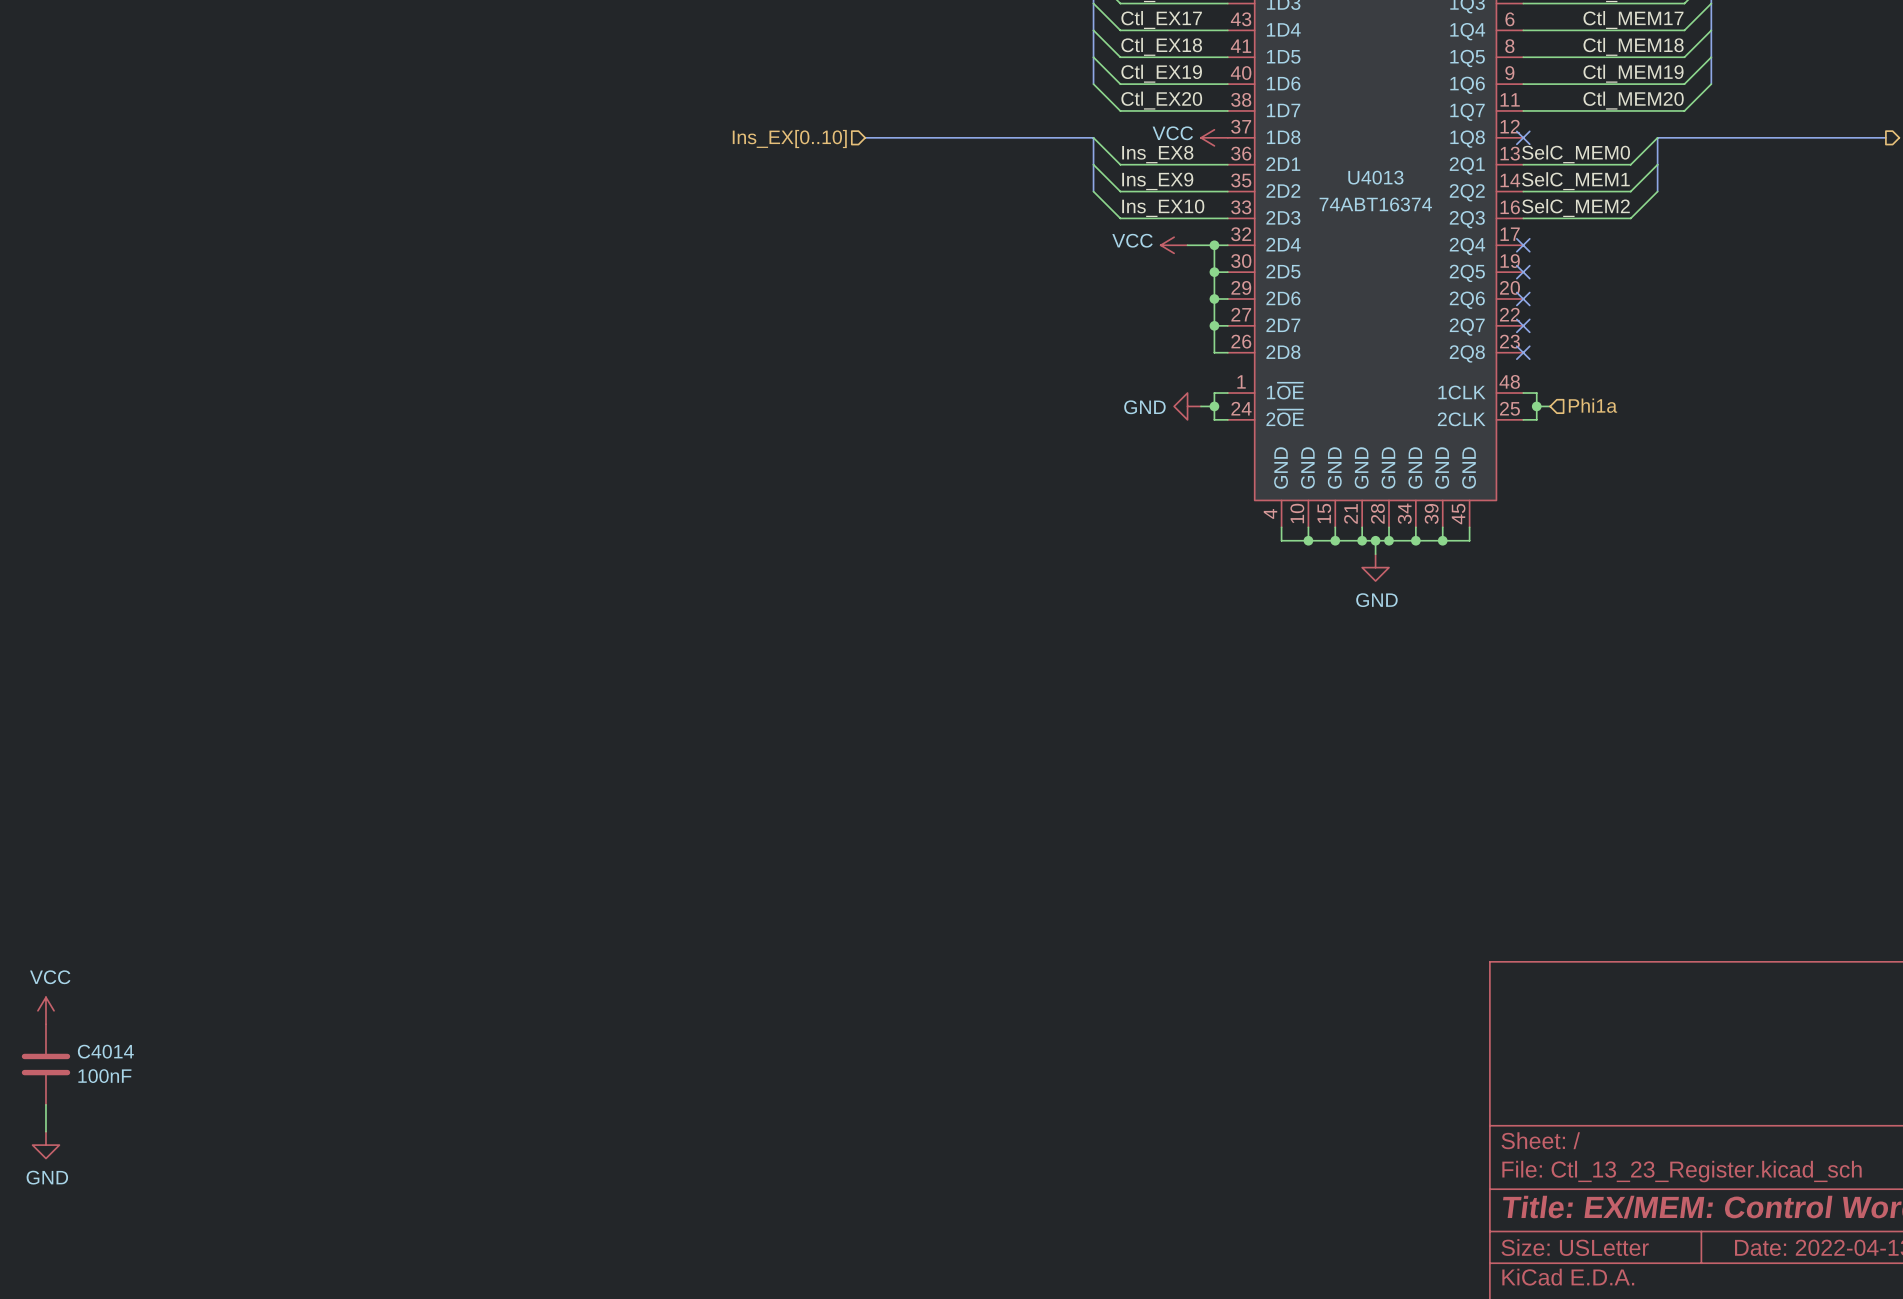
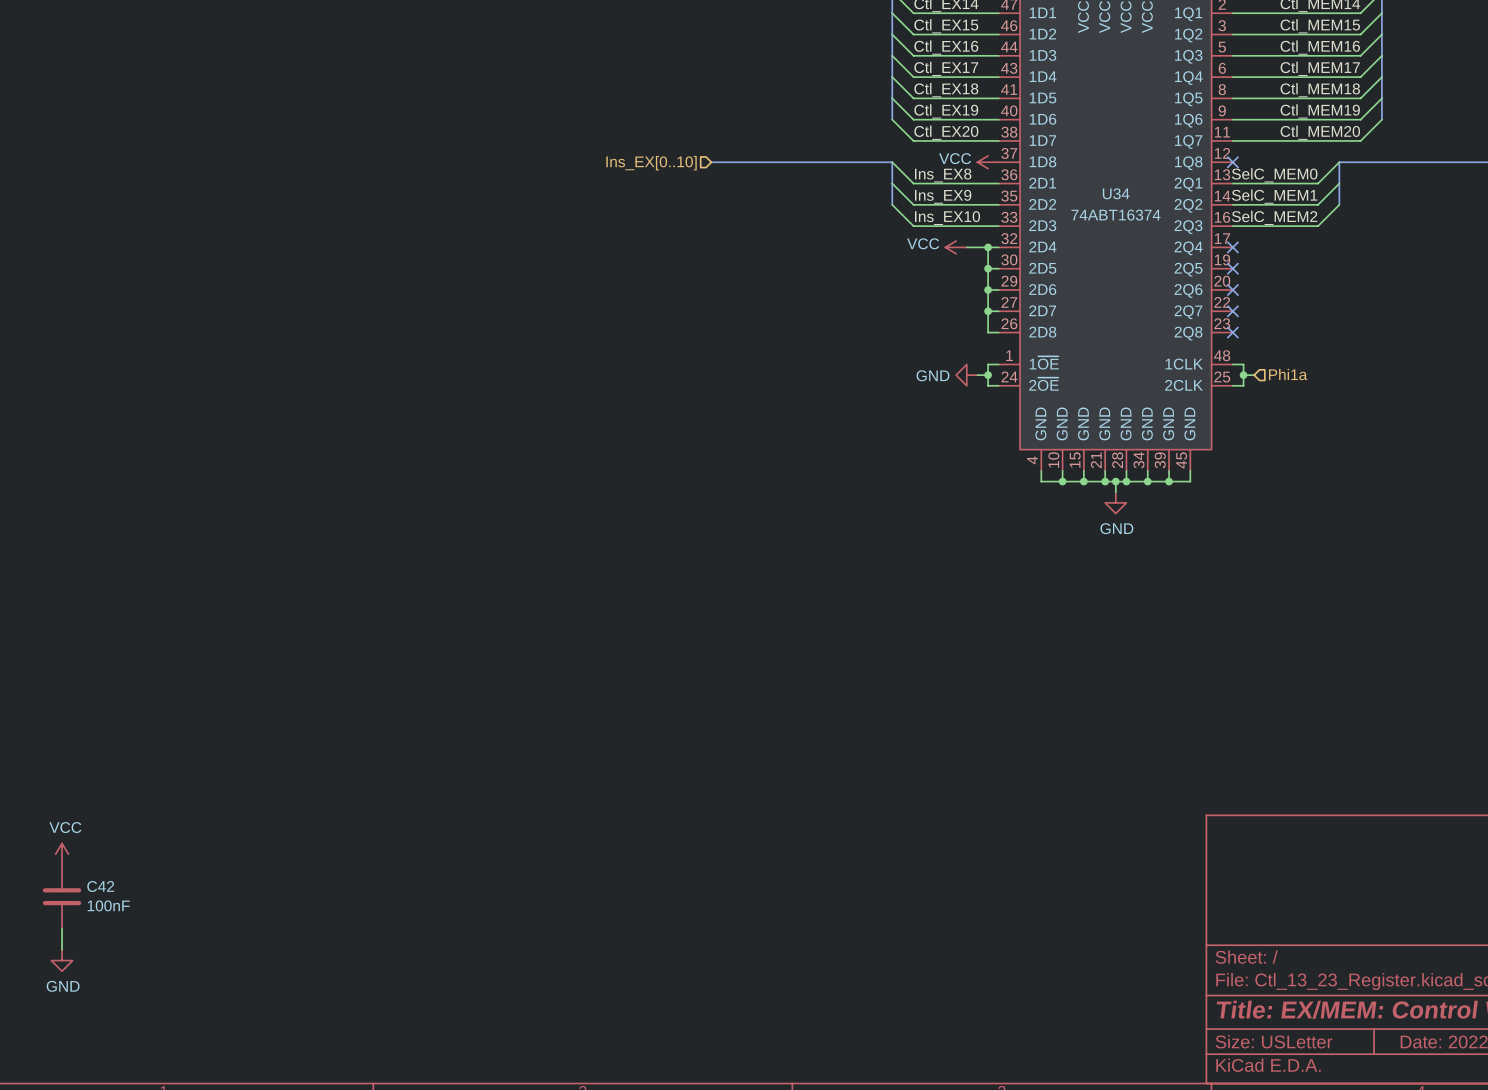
U4013 name: U4013 (1375, 177) -> U34 (1116, 193)
C4014 name: C4014 (105, 1051) -> C42 (100, 886)

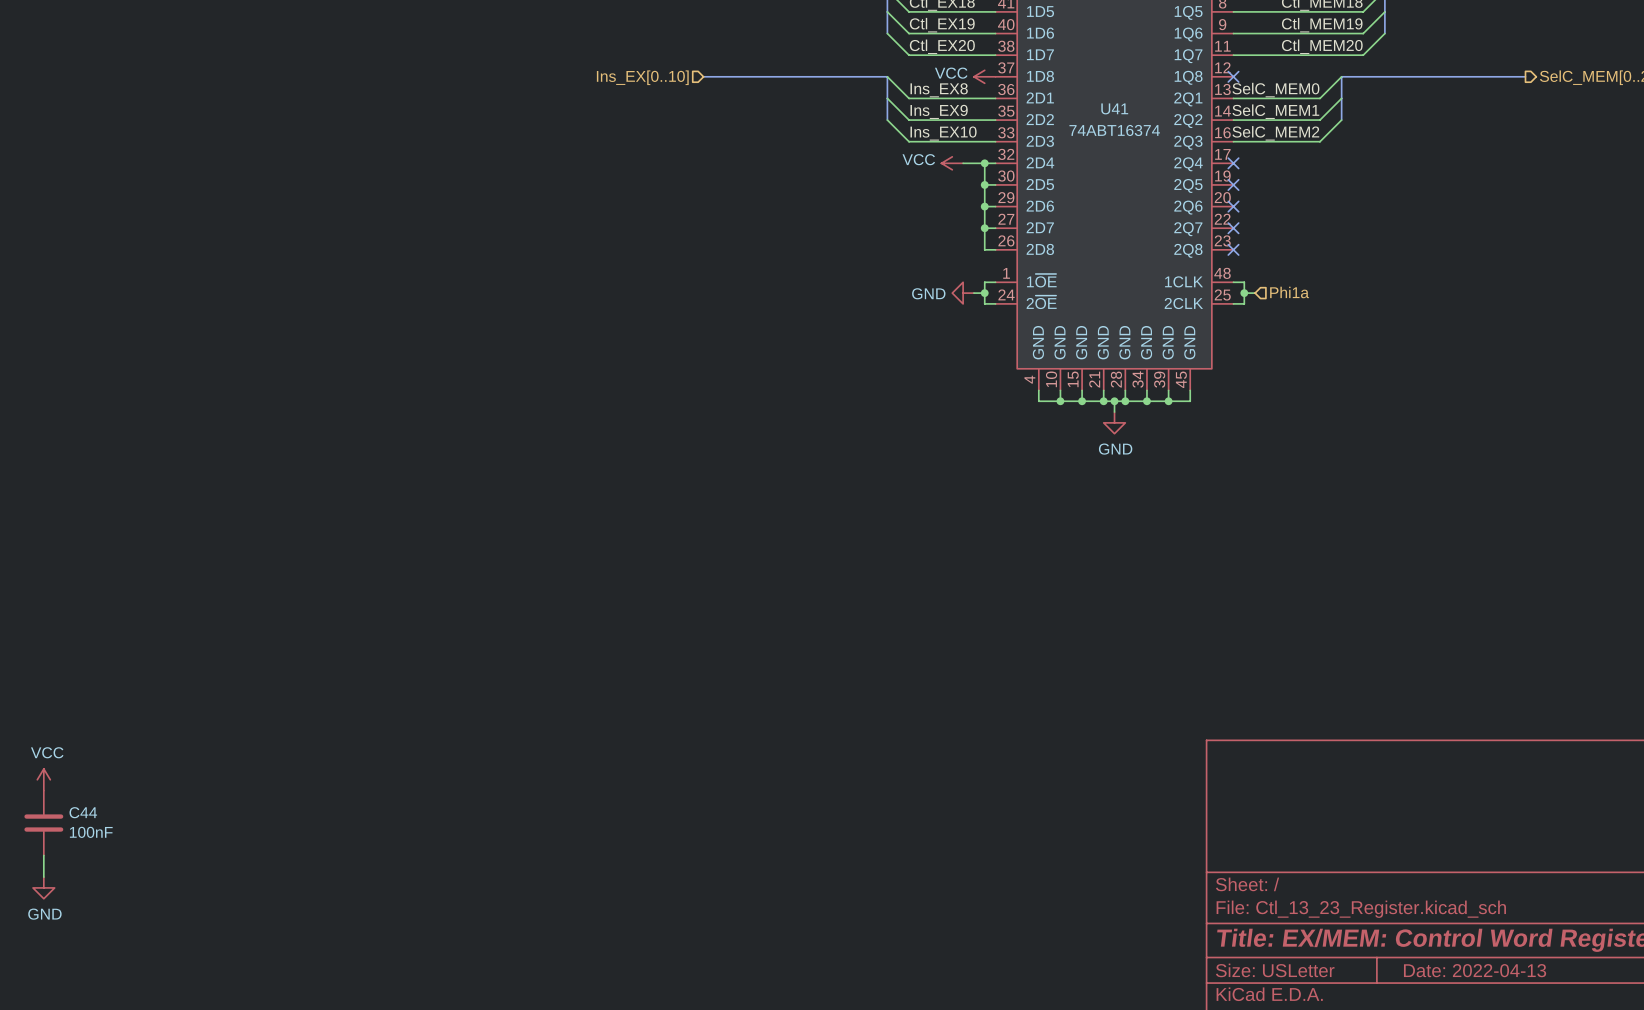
U34 name: U34 (1116, 193) -> U41 (1114, 108)
C42 name: C42 (100, 886) -> C44 (83, 812)

